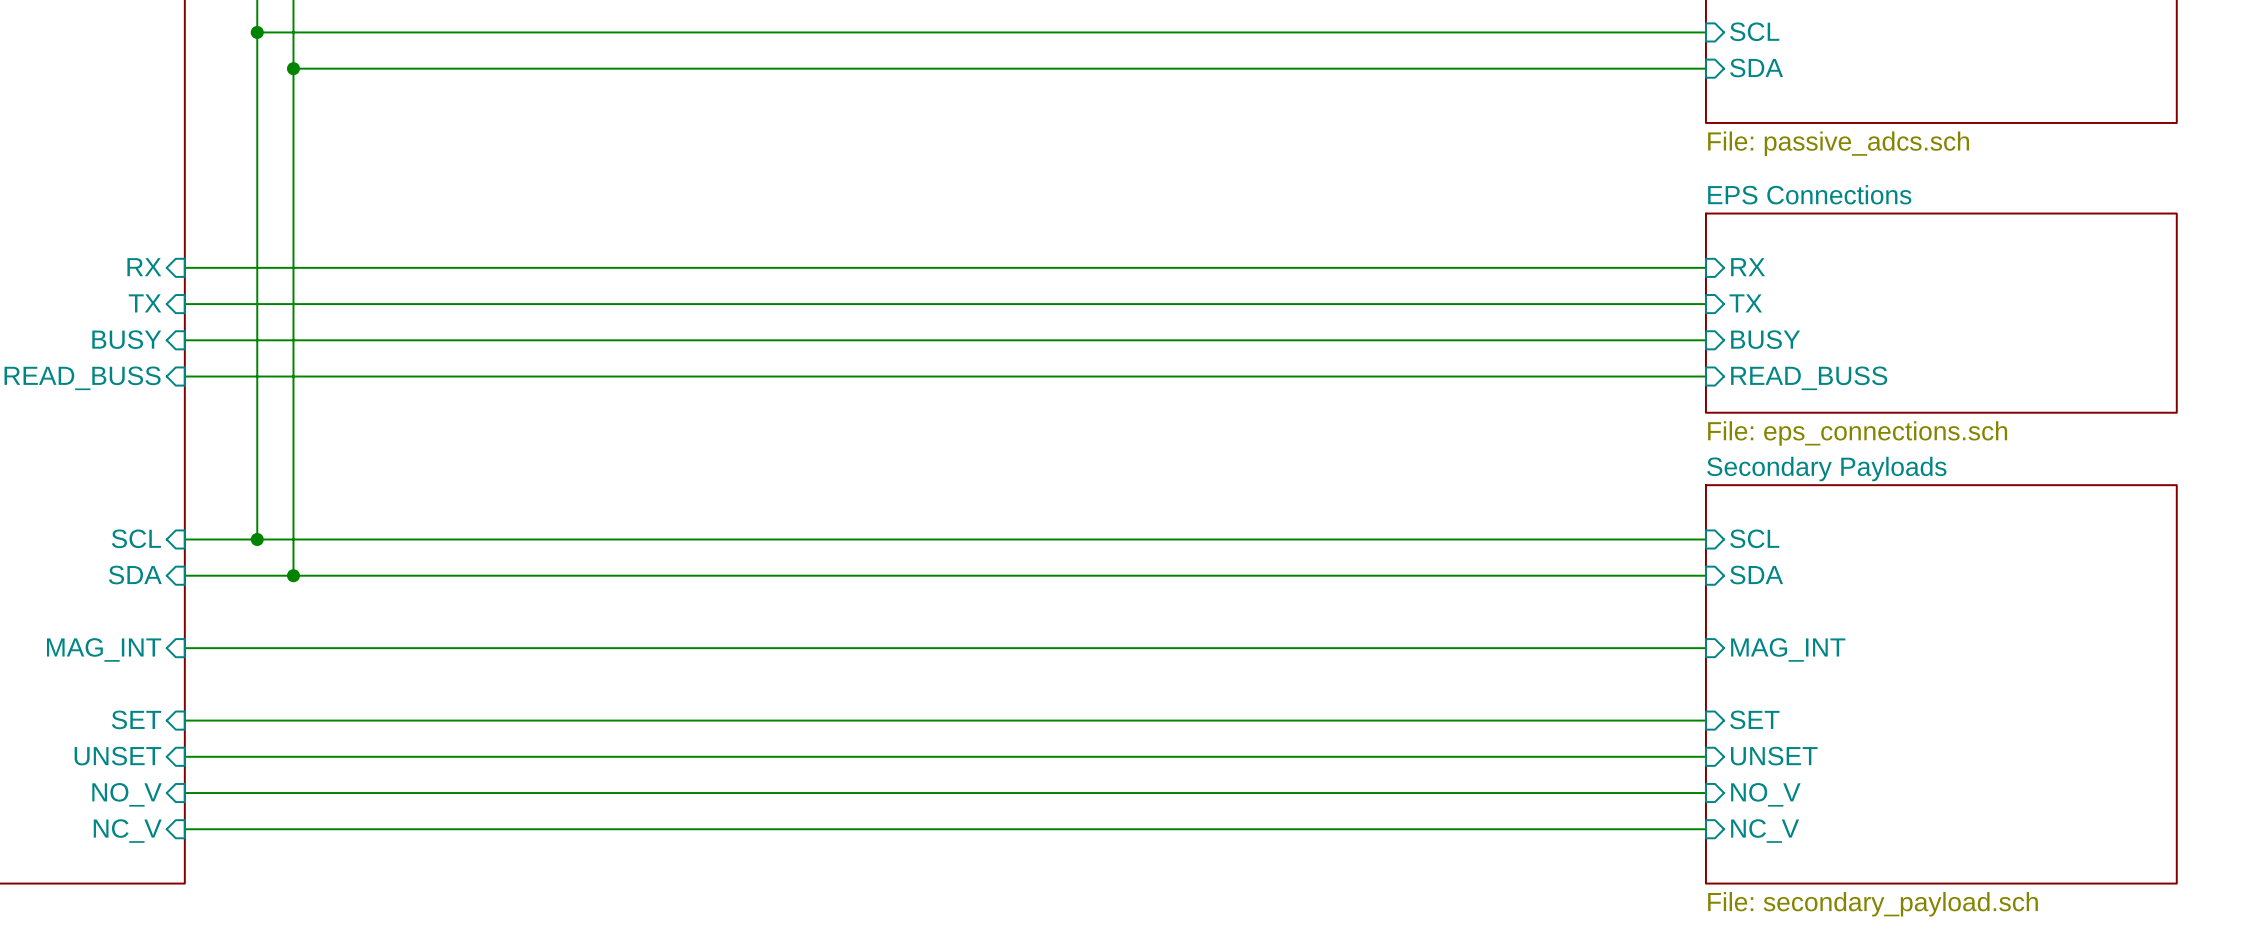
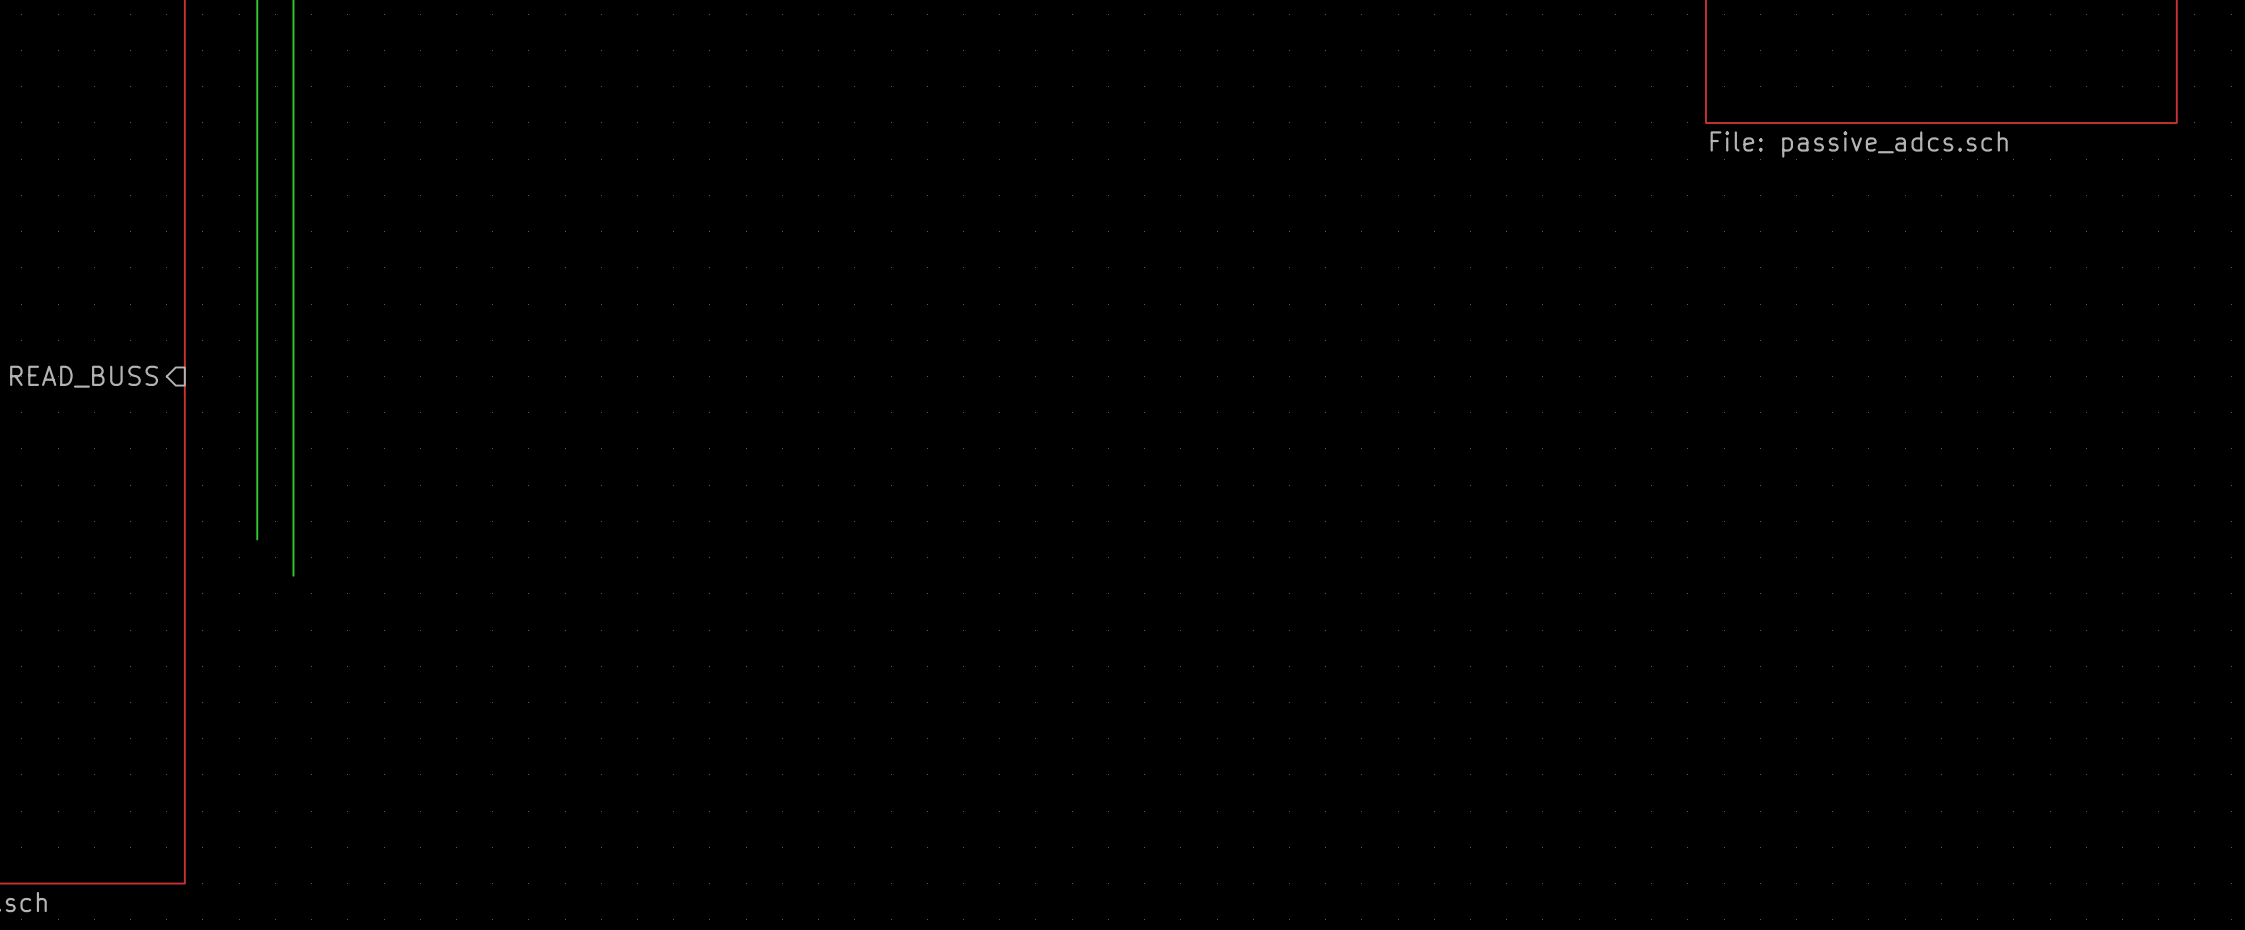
sheet pin: SCL (1754, 31) -> none
wire: (257, 32) (1705, 32) -> none
junction: (257, 32) -> none
sheet pin: SDA (1756, 67) -> none
wire: (293, 68) (1705, 68) -> none
junction: (293, 68) -> none
sheet pin: RX (144, 267) -> none
wire: (184, 267) (1705, 267) -> none
sheet pin: RX (1748, 267) -> none
sheet pin: TX (145, 303) -> none
sheet pin: TX (1745, 303) -> none
wire: (184, 304) (1705, 304) -> none
sheet EPS Connections: File: eps_connections.sch (1941, 313) -> none
sheet pin: BUSY (126, 339) -> none
sheet pin: BUSY (1765, 339) -> none
wire: (184, 340) (1705, 340) -> none
wire: (184, 376) (1705, 376) -> none
sheet pin: READ_BUSS (1809, 378) -> none
sheet pin: SCL (136, 538) -> none
sheet pin: SCL (1754, 538) -> none
wire: (184, 539) (1705, 539) -> none
junction: (257, 539) -> none
sheet pin: SDA (135, 575) -> none
wire: (184, 575) (1705, 575) -> none
junction: (293, 575) -> none
sheet pin: SDA (1756, 575) -> none
wire: (184, 648) (1705, 648) -> none
sheet pin: MAG_INT (104, 649) -> none
sheet pin: MAG_INT (1788, 649) -> none
sheet Secondary Payloads: File: secondary_payload.sch (1941, 684) -> none
sheet pin: SET (136, 719) -> none
sheet pin: SET (1754, 719) -> none
wire: (184, 720) (1705, 720) -> none
sheet pin: UNSET (117, 756) -> none
wire: (184, 756) (1705, 756) -> none
sheet pin: UNSET (1774, 756) -> none
wire: (184, 793) (1705, 793) -> none
sheet pin: NO_V (127, 794) -> none
sheet pin: NO_V (1765, 794) -> none
wire: (184, 829) (1705, 829) -> none
sheet pin: NC_V (127, 831) -> none
sheet pin: NC_V (1765, 831) -> none

